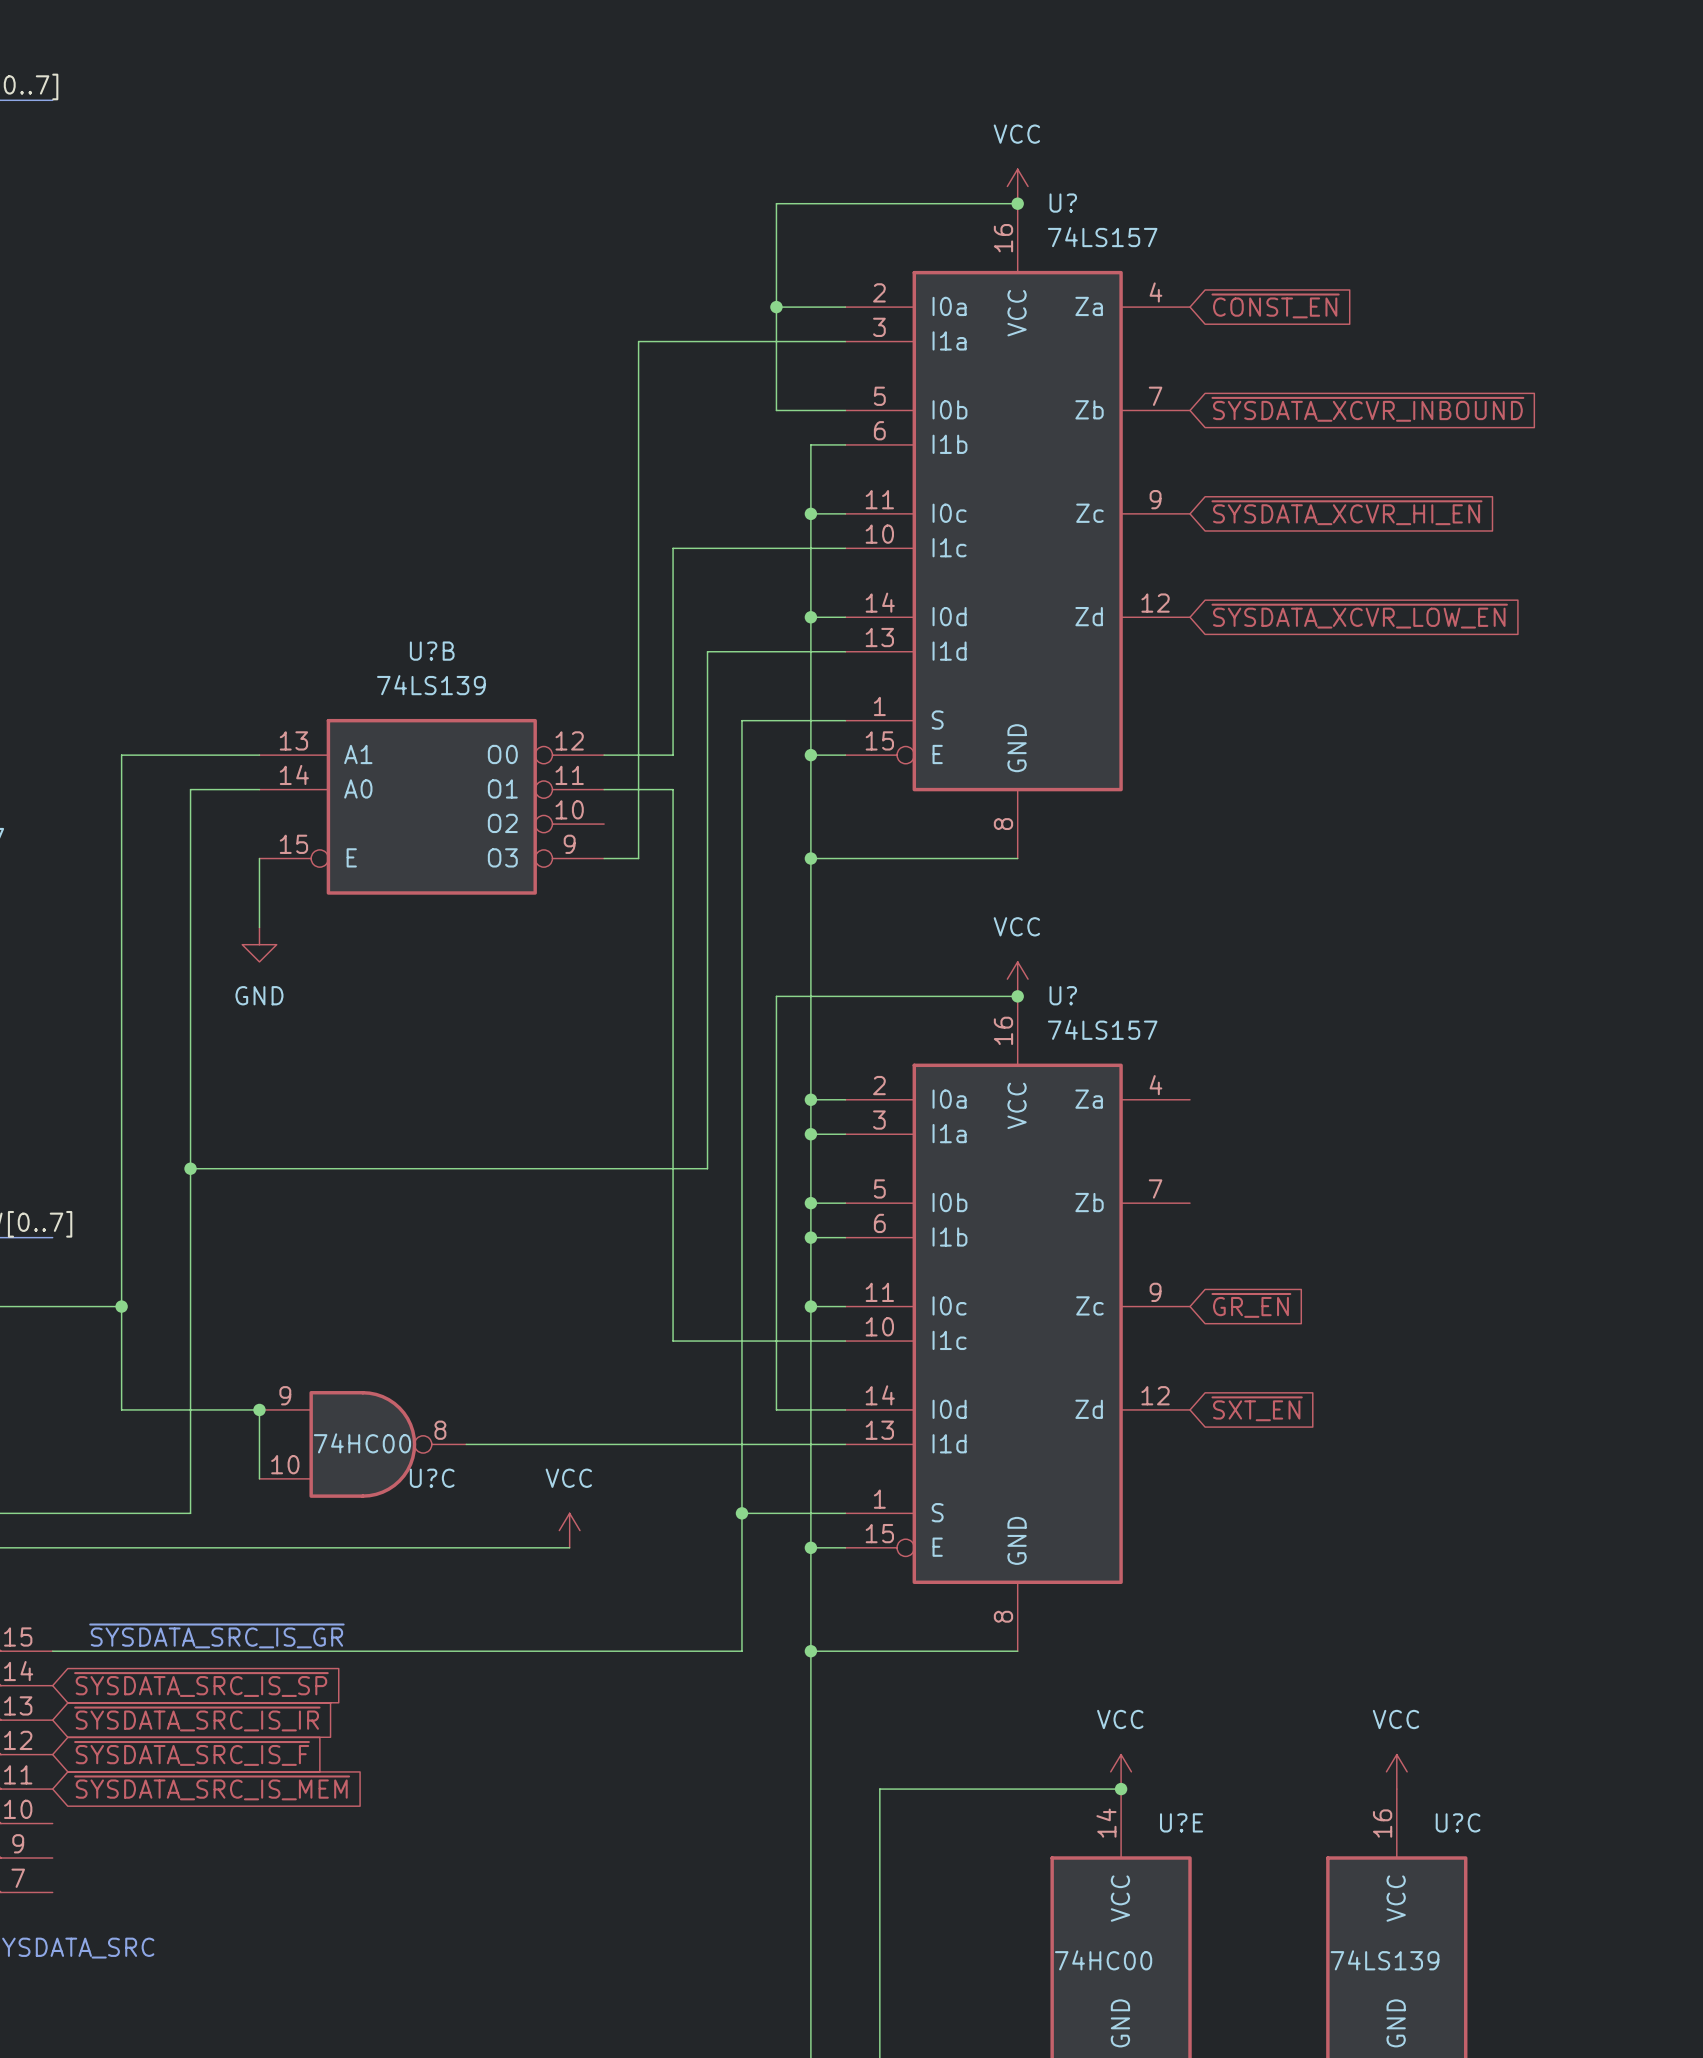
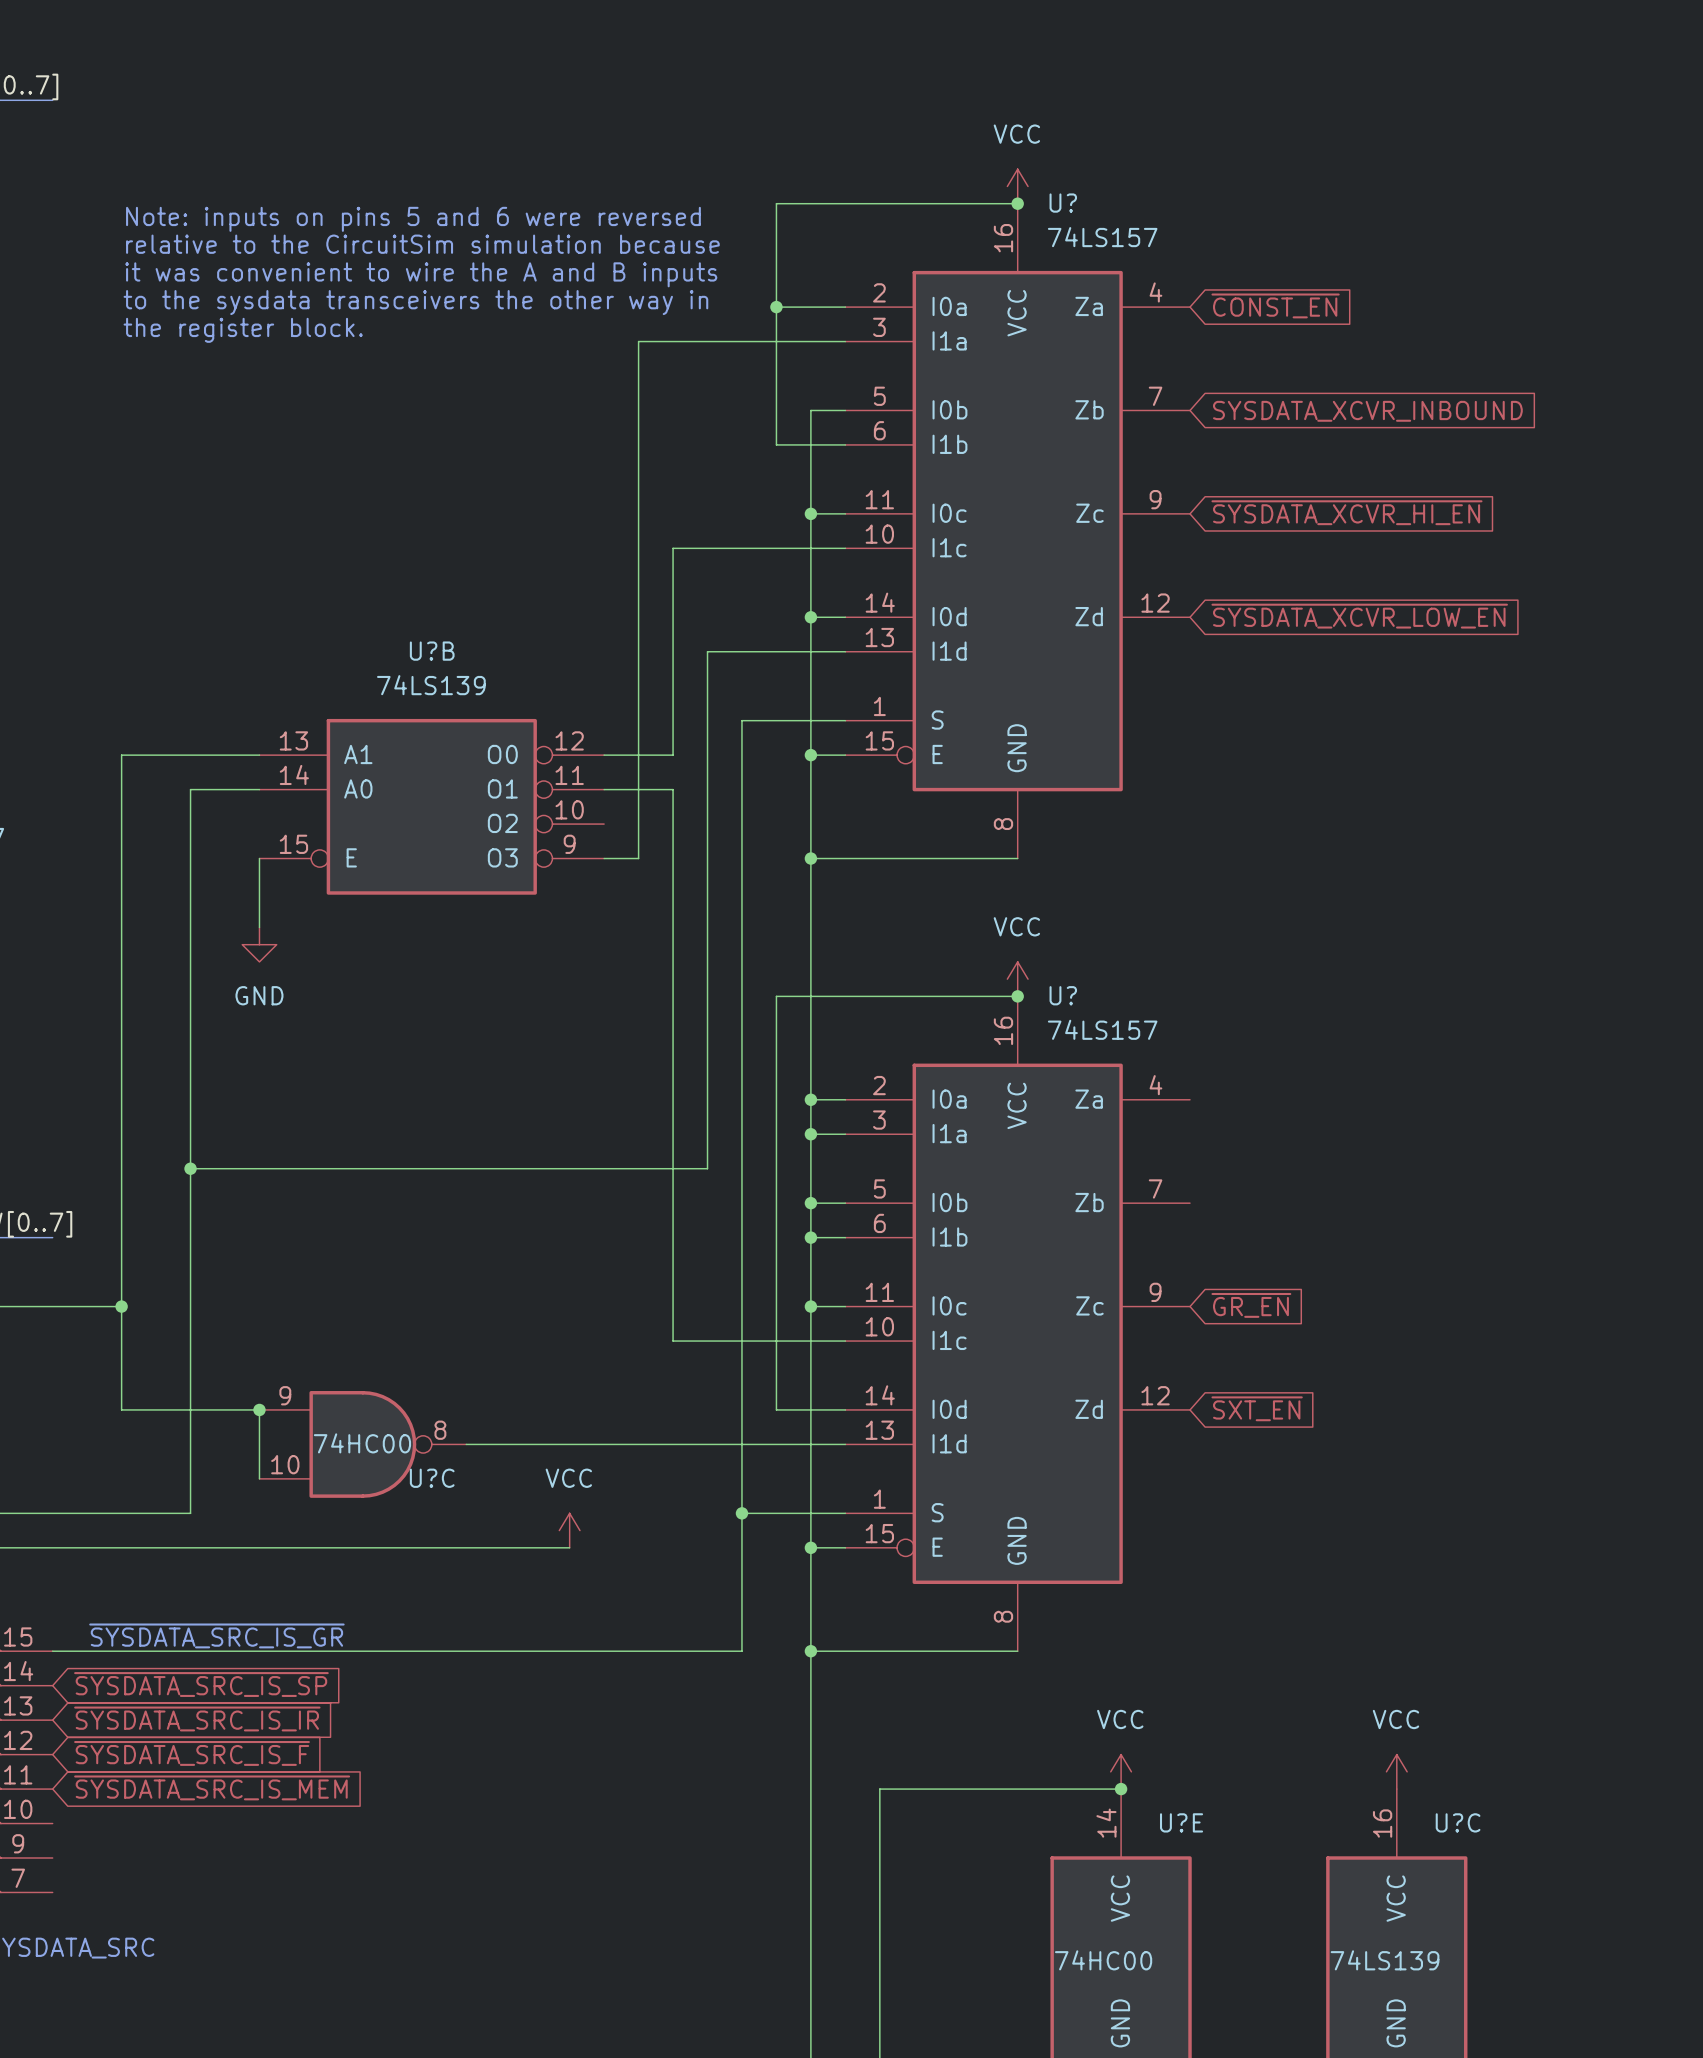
text: none -> Note: inputs on pins 5 and 6 were reversed (413, 219)
text: none -> relative to the CircuitSim simulation because (422, 244)
text: none -> it was convenient to wire the A and B inputs (421, 274)
text: none -> to the sysdata transceivers the other way in (415, 302)
text: none -> the register block. (243, 330)
global label: ~{SYSDATA_XCVR_INBOUND} (1367, 409) -> SYSDATA_XCVR_INBOUND (1367, 411)
wire: (776, 410) (810, 410) -> (776, 410) (776, 444) (810, 444) (810, 410)

